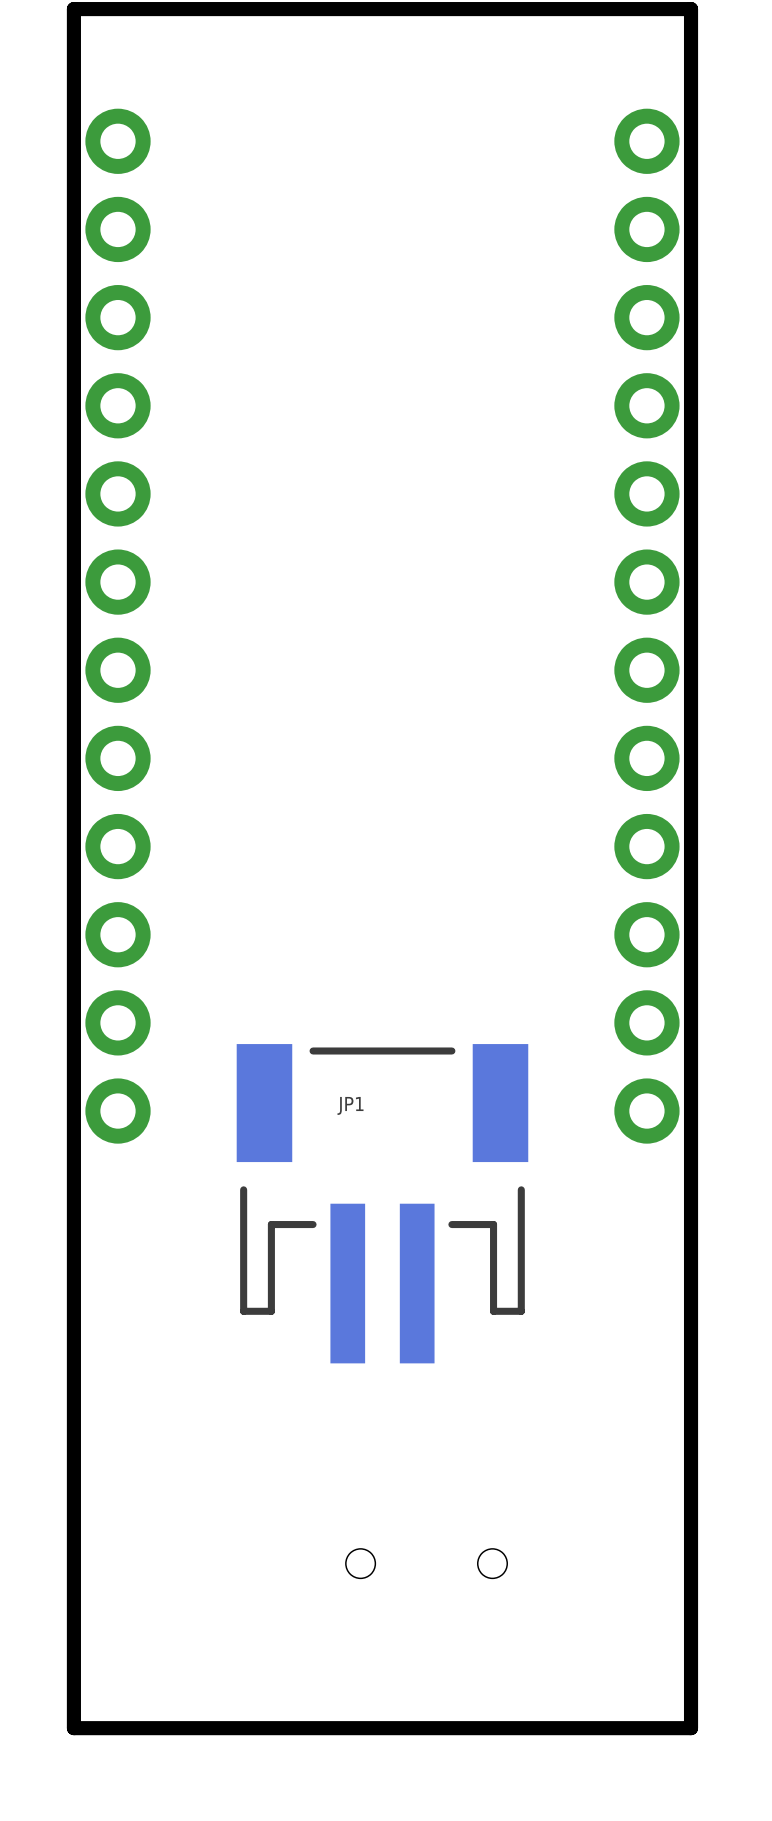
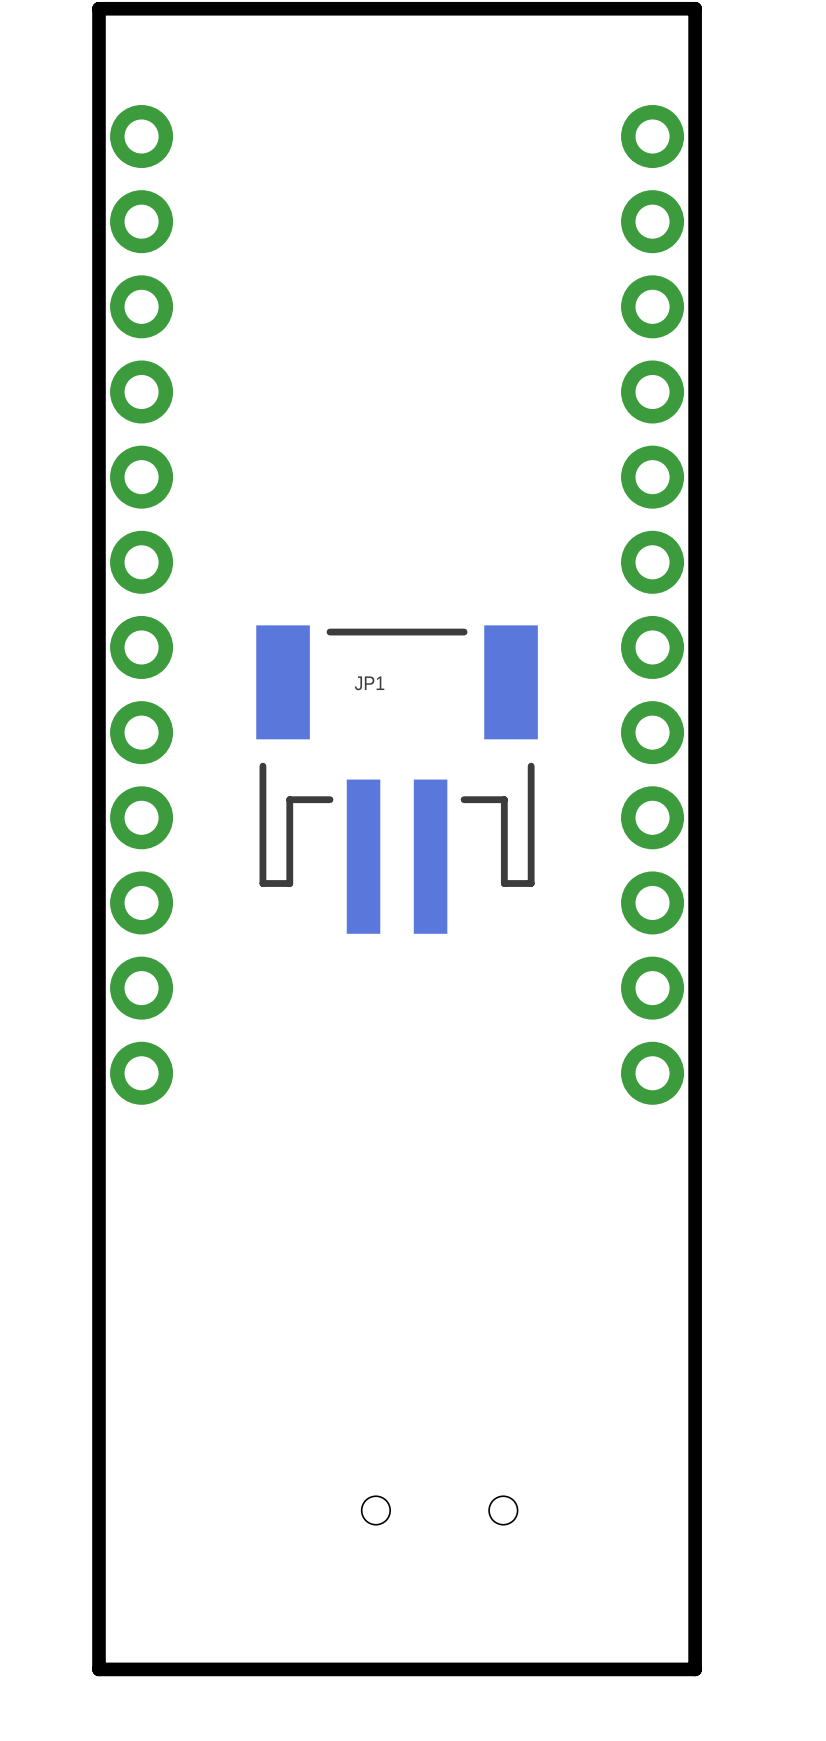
JP1 position: (382, 1203) -> (397, 779)

